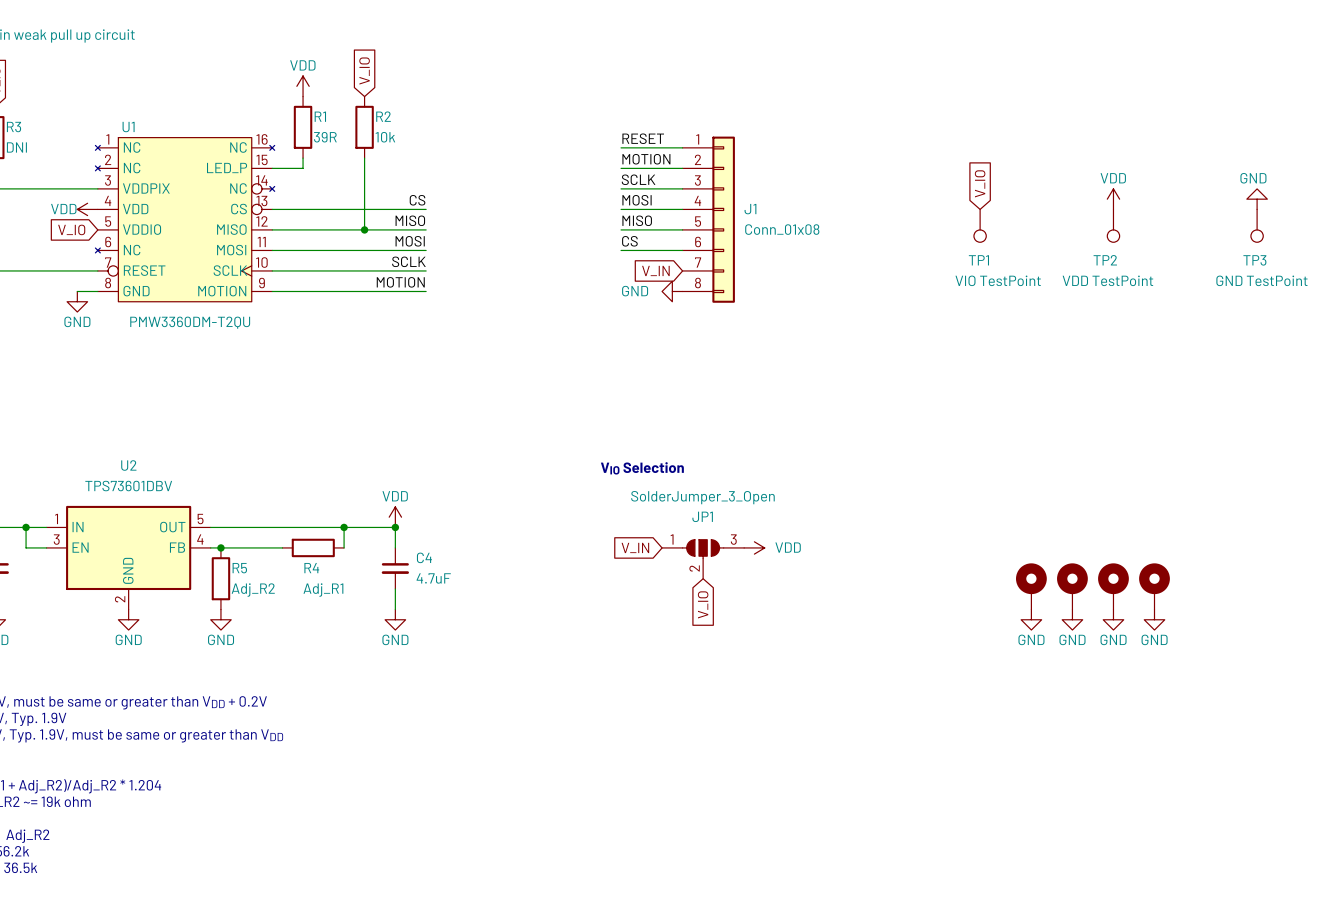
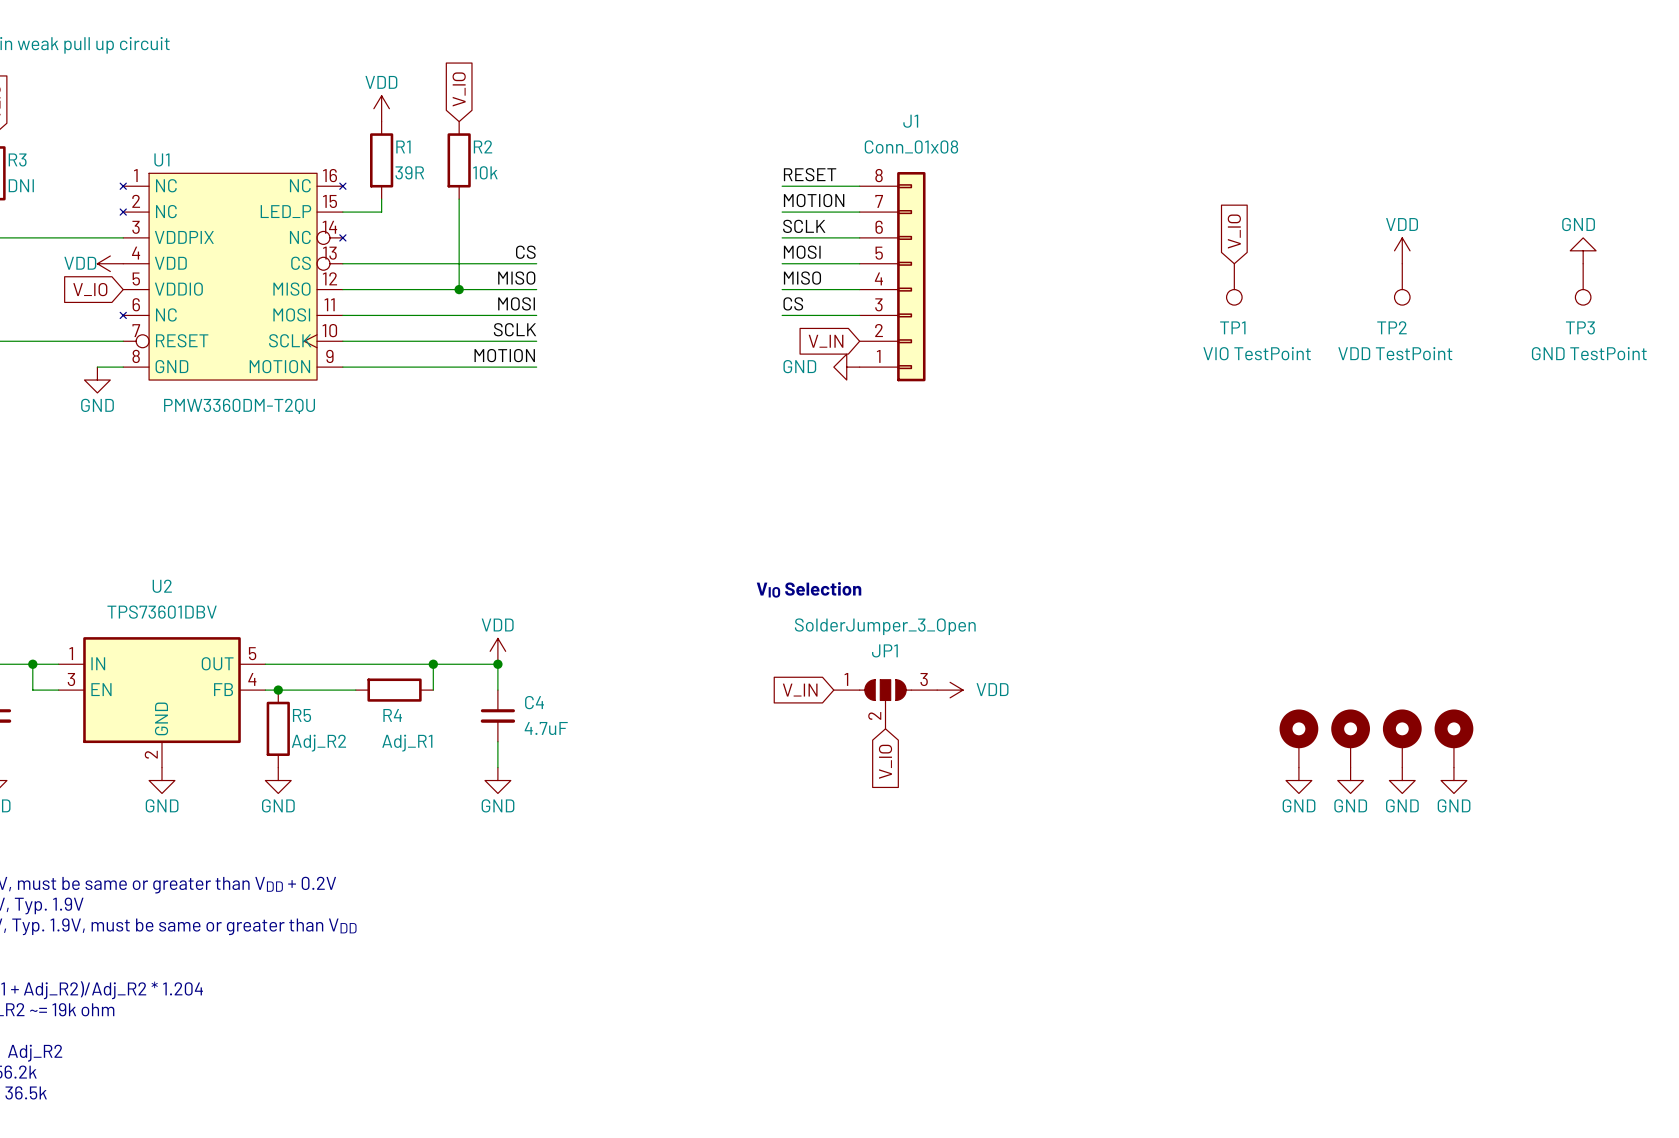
J1 name position: J1 (750, 209) -> J1 (910, 121)
J1 flip: as is (723, 219) -> up-down (911, 276)
J1 value position: Conn_01x08 (782, 229) -> Conn_01x08 (911, 146)

